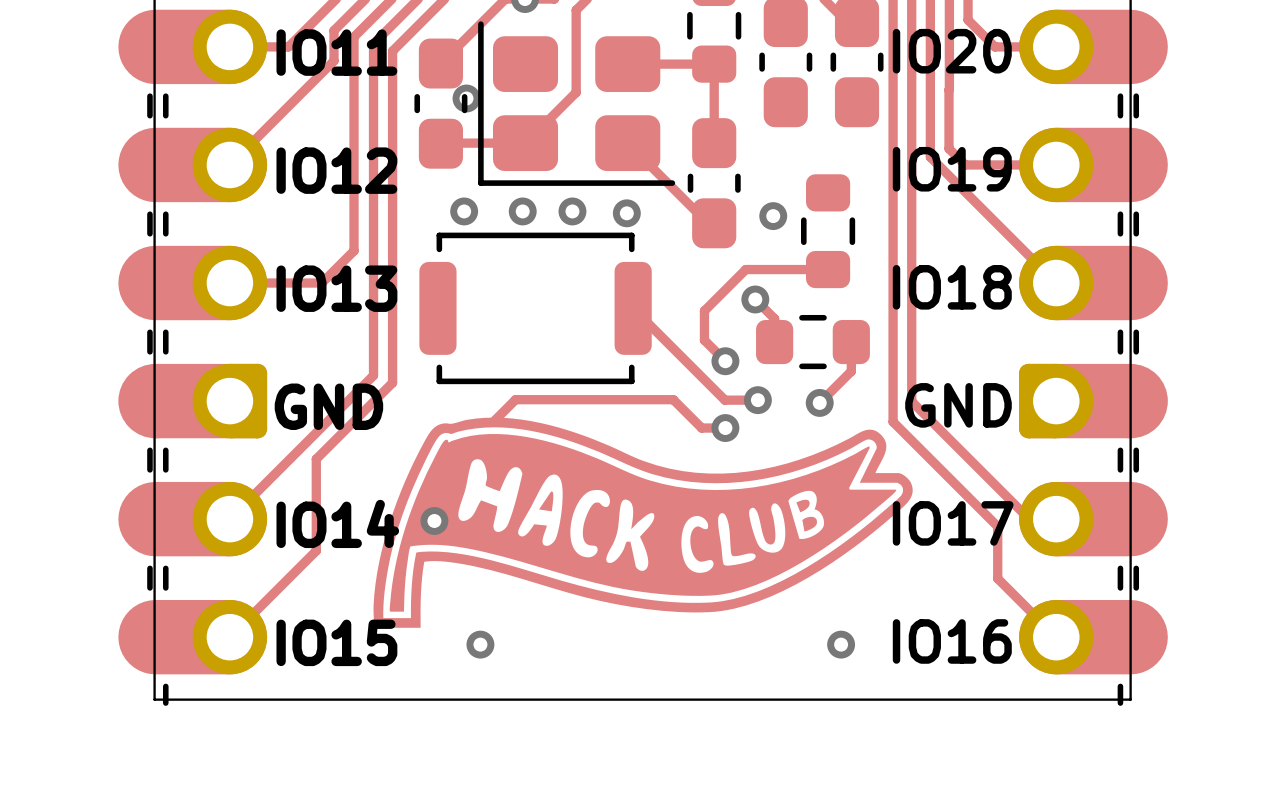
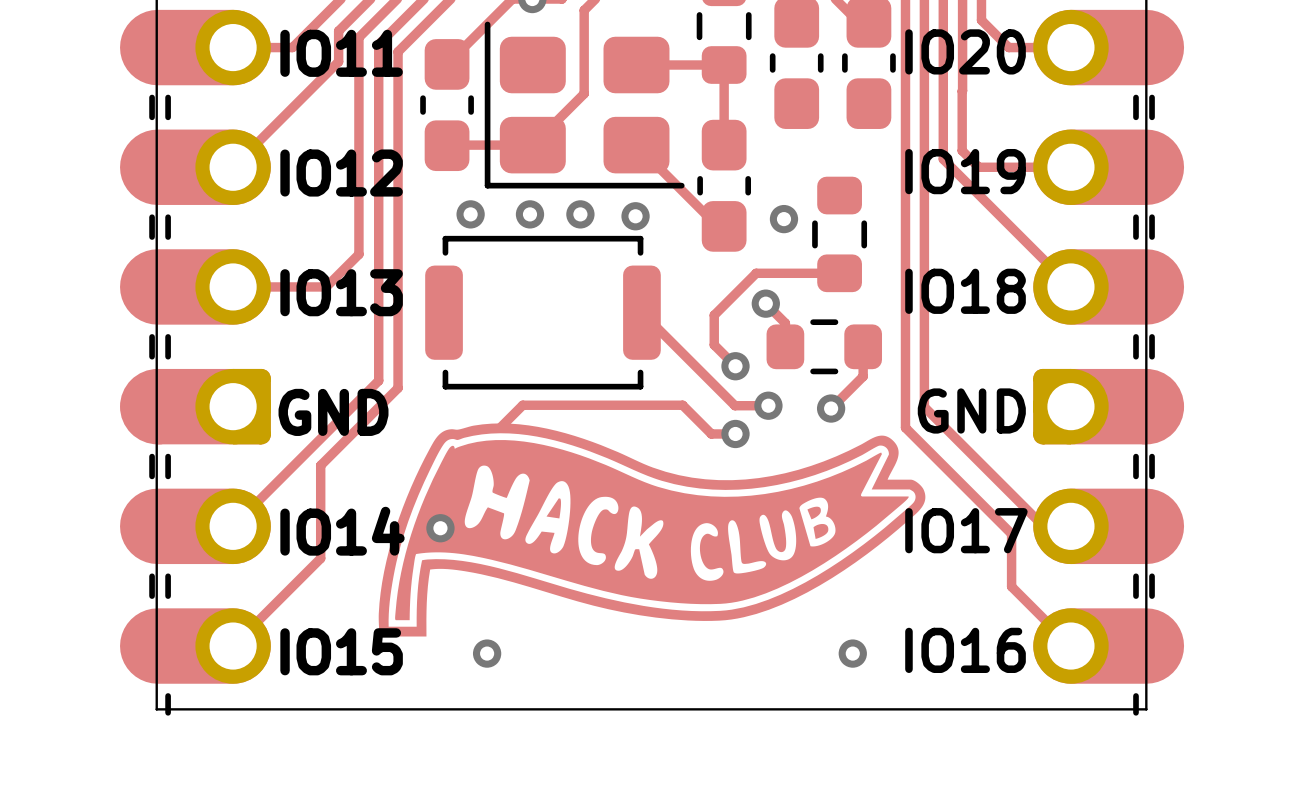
via: (466, 98) -> none

